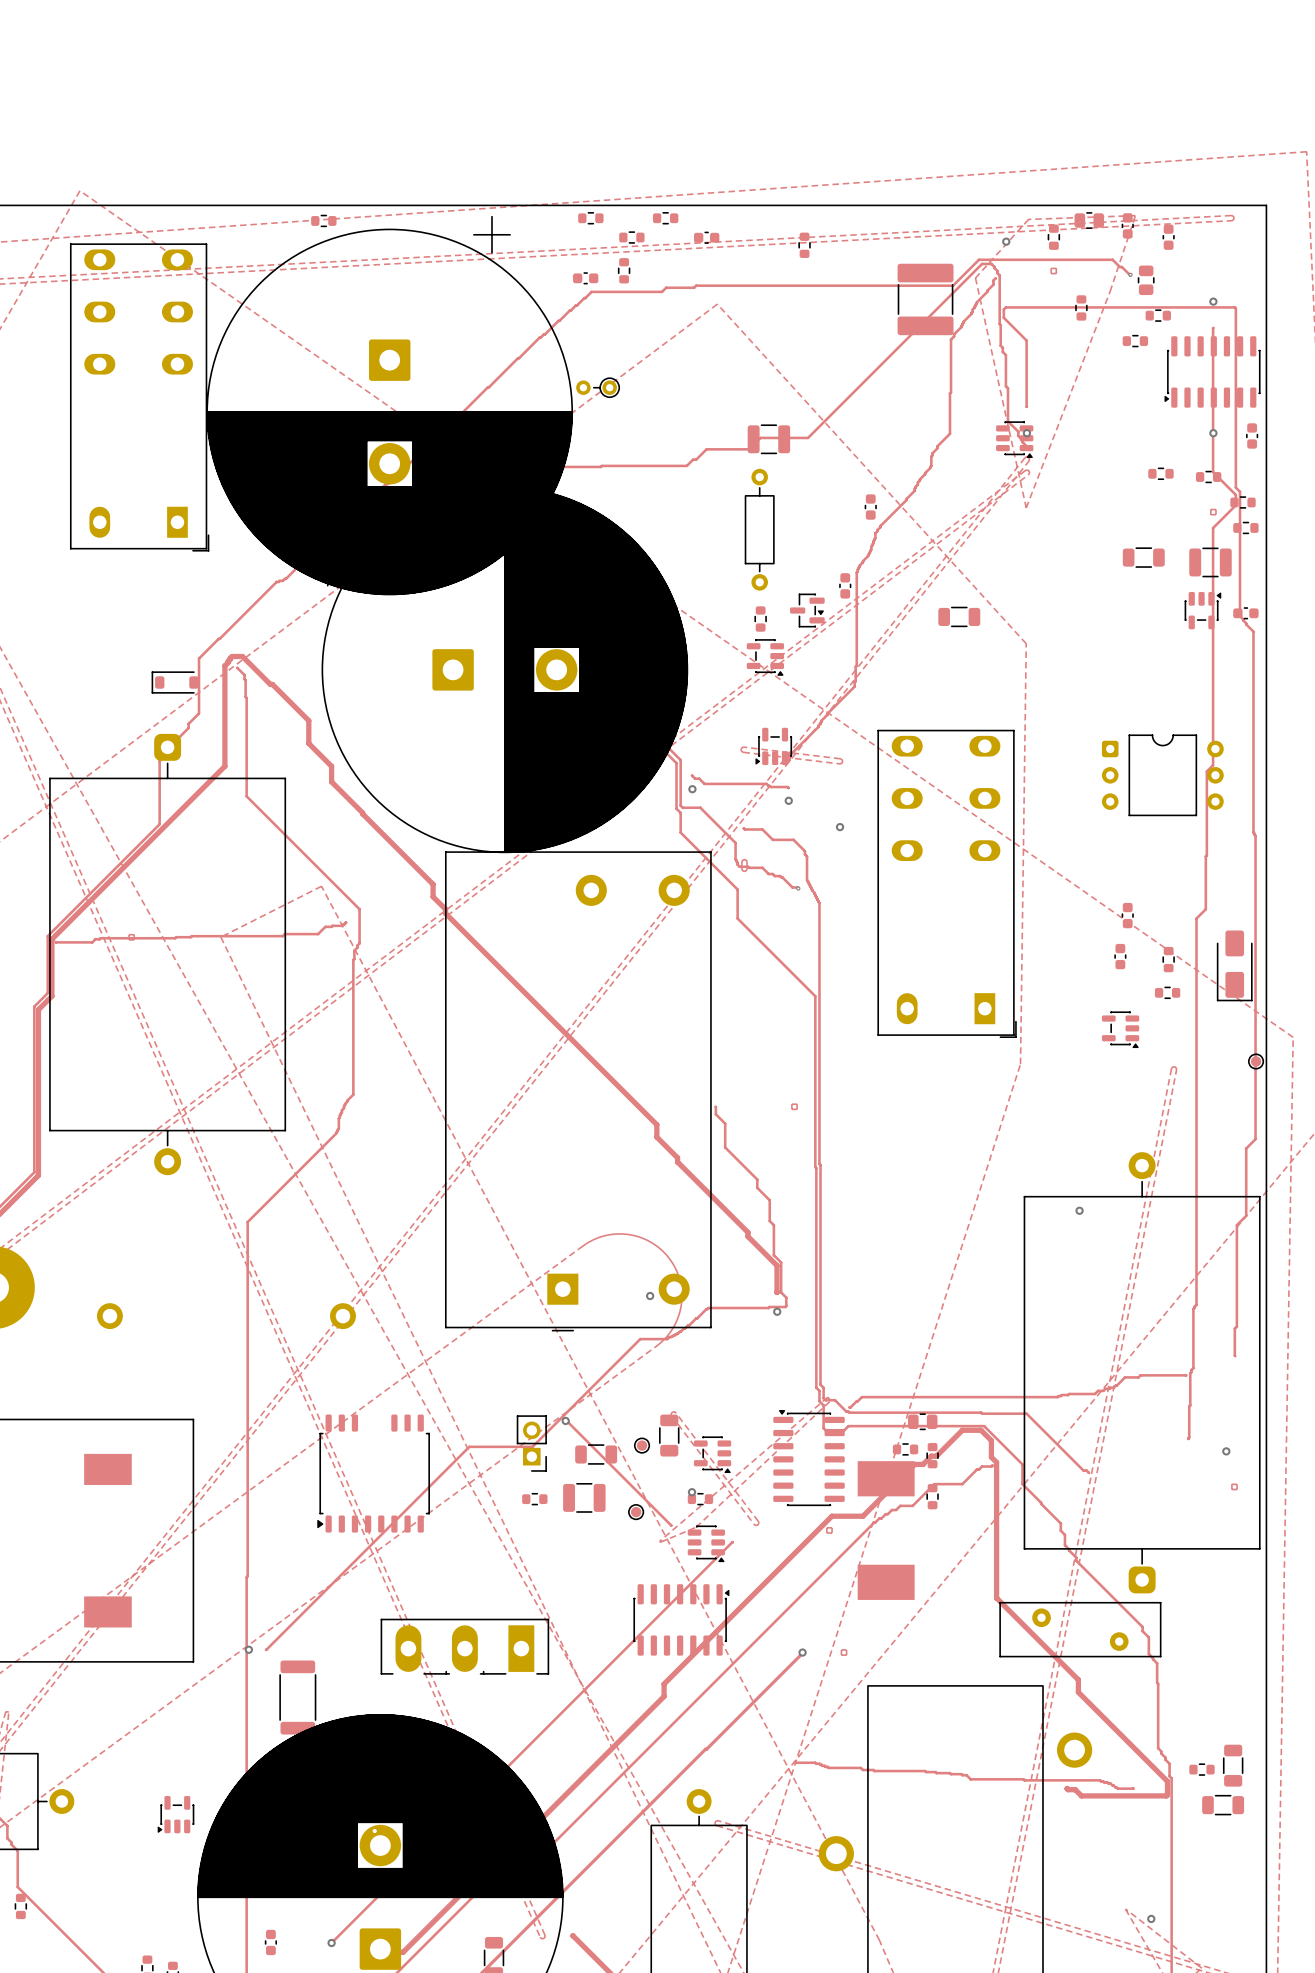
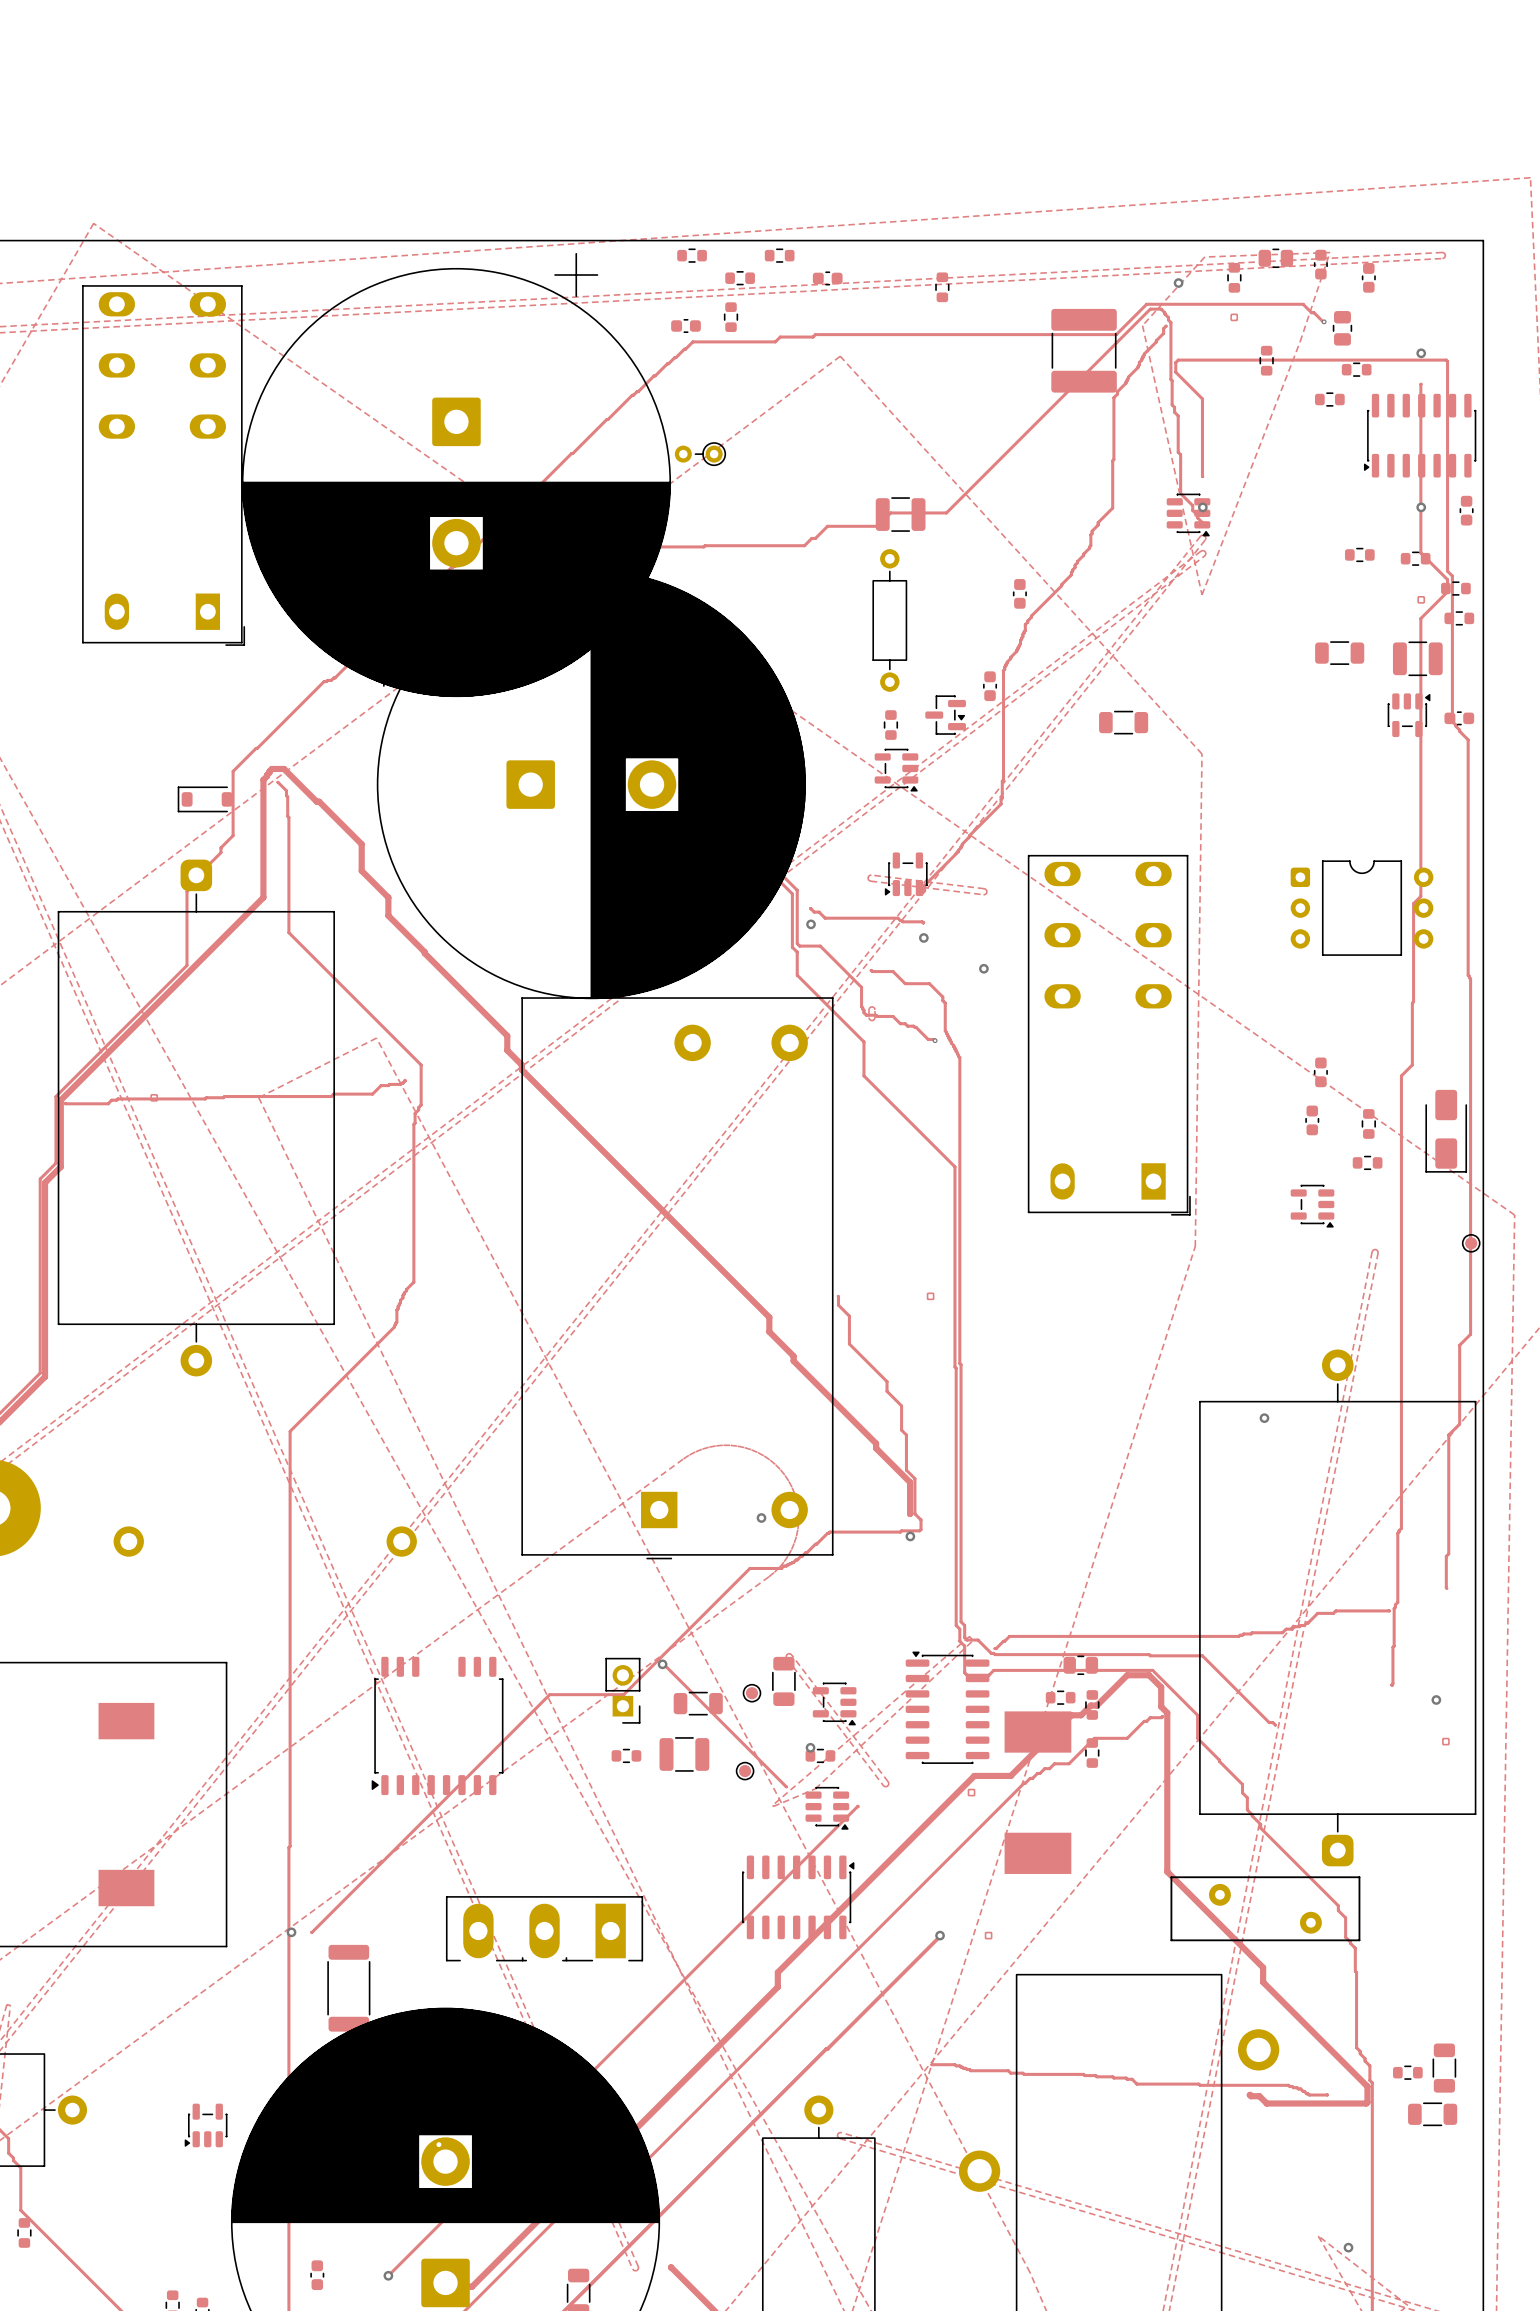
part: (323, 220) -> none

